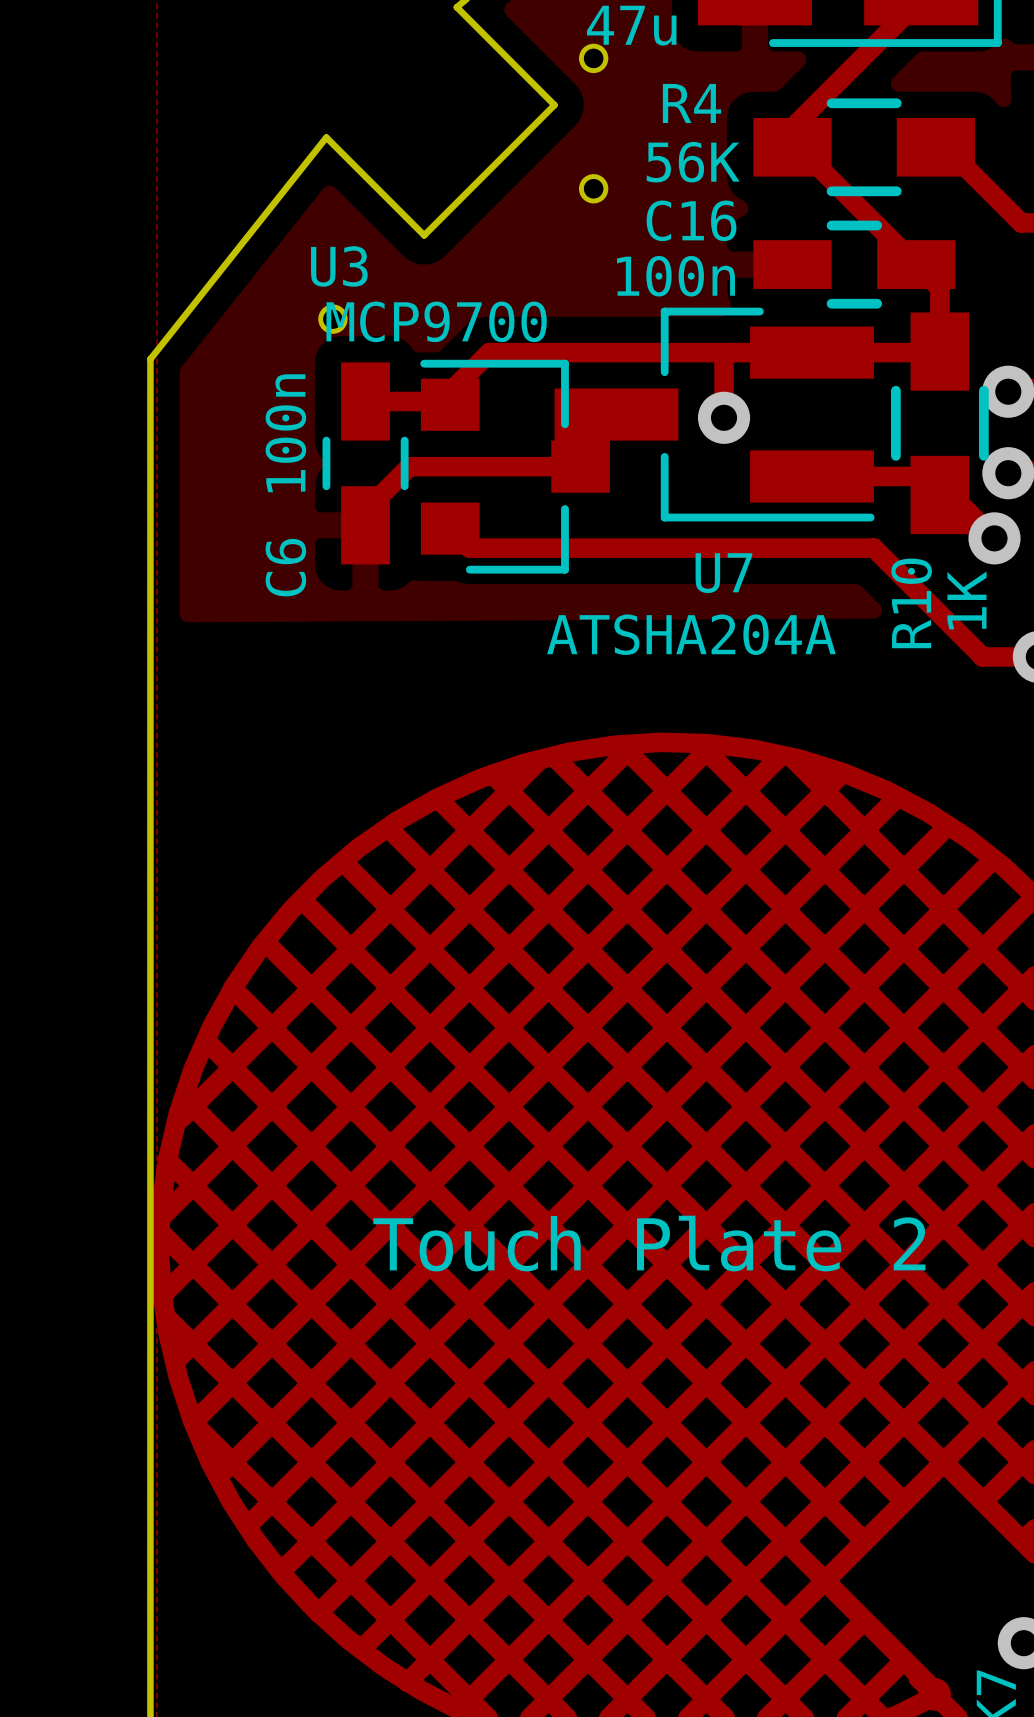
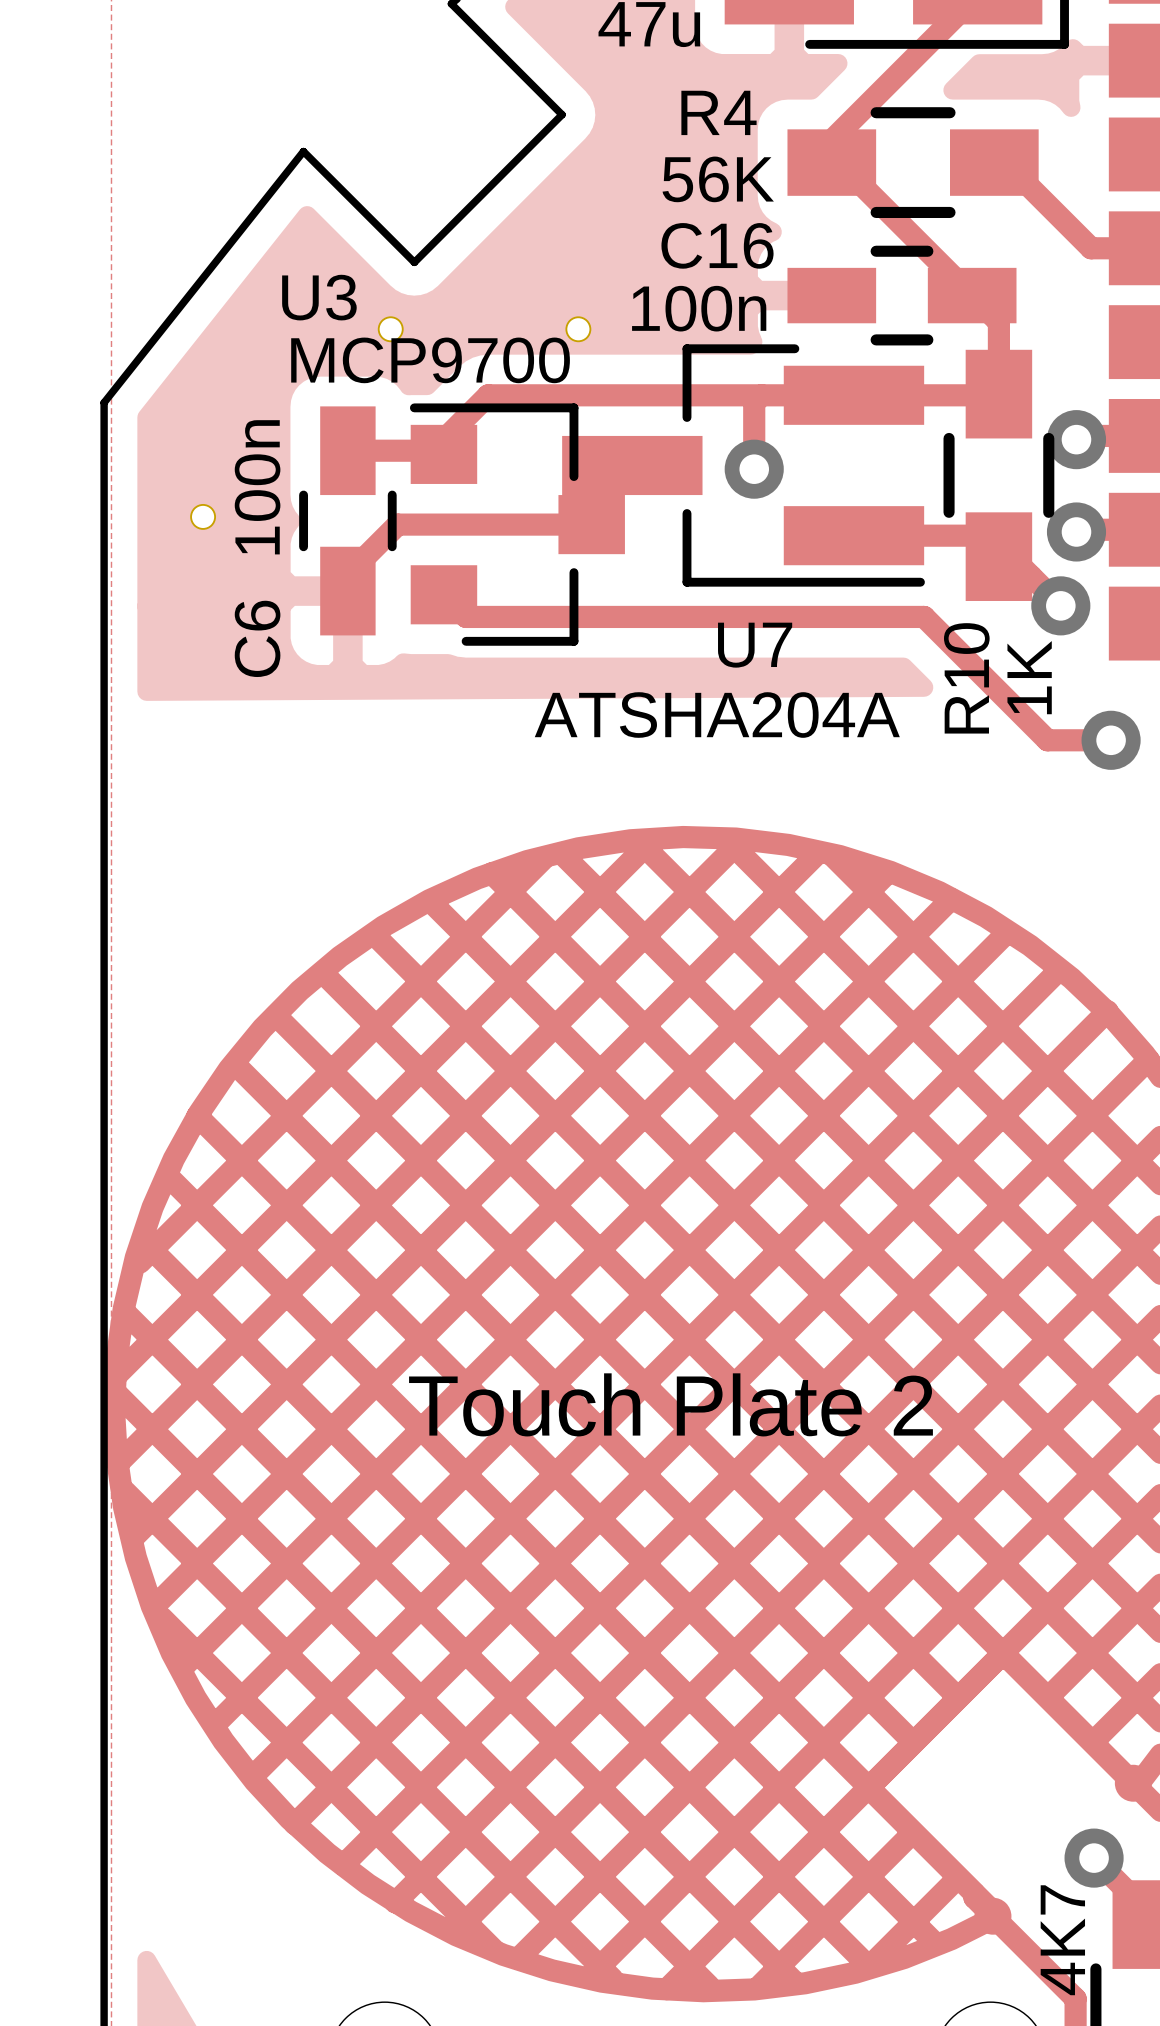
part: (593, 58) -> none
part: (593, 188) -> none
part: none -> (390, 329)
part: none -> (578, 329)
part: (332, 319) -> none
part: none -> (203, 516)

